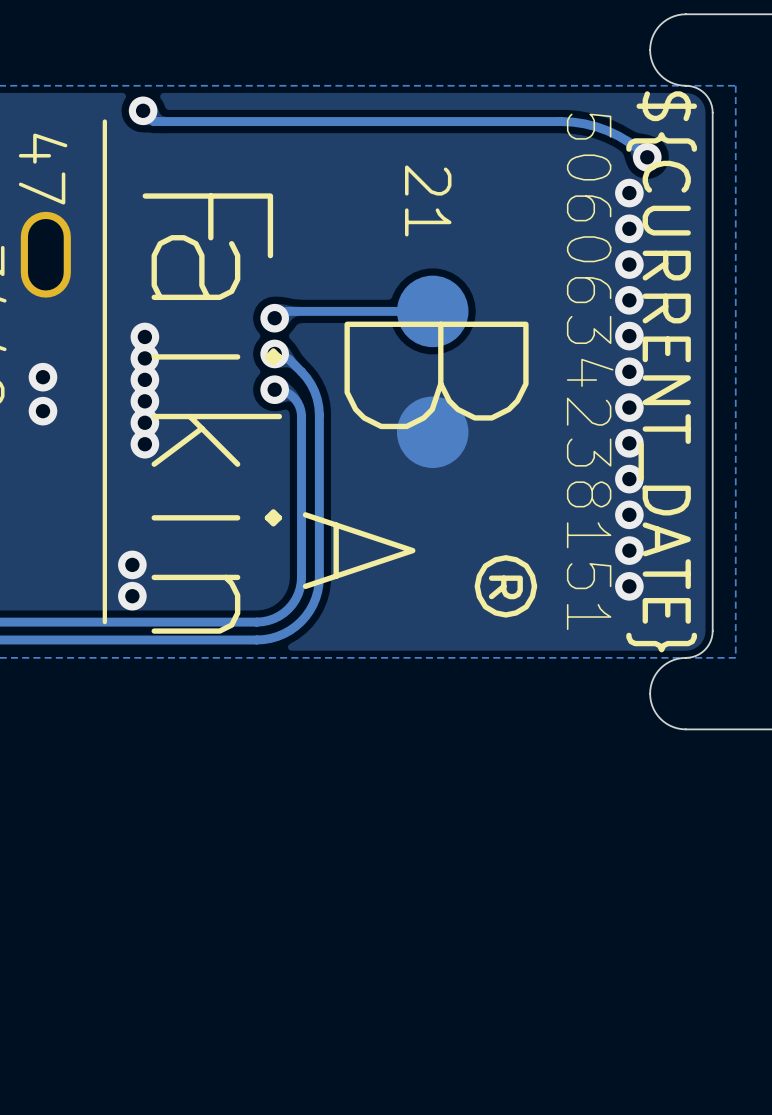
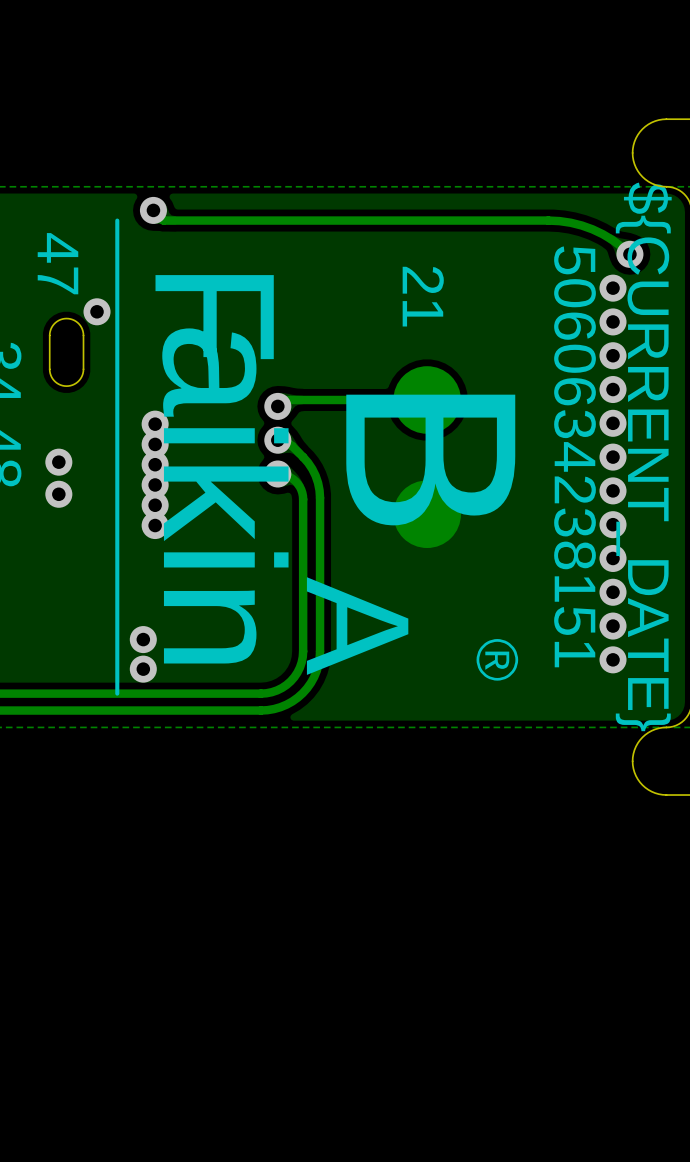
via: none -> (97, 311)
board edge: none -> (83, 335) (83, 369) (81, 377) (72, 385) (58, 384) (52, 378) (49, 371) (49, 335) (51, 327) (58, 320) (70, 319) (80, 325) (83, 335)
part: (45, 254) -> none

